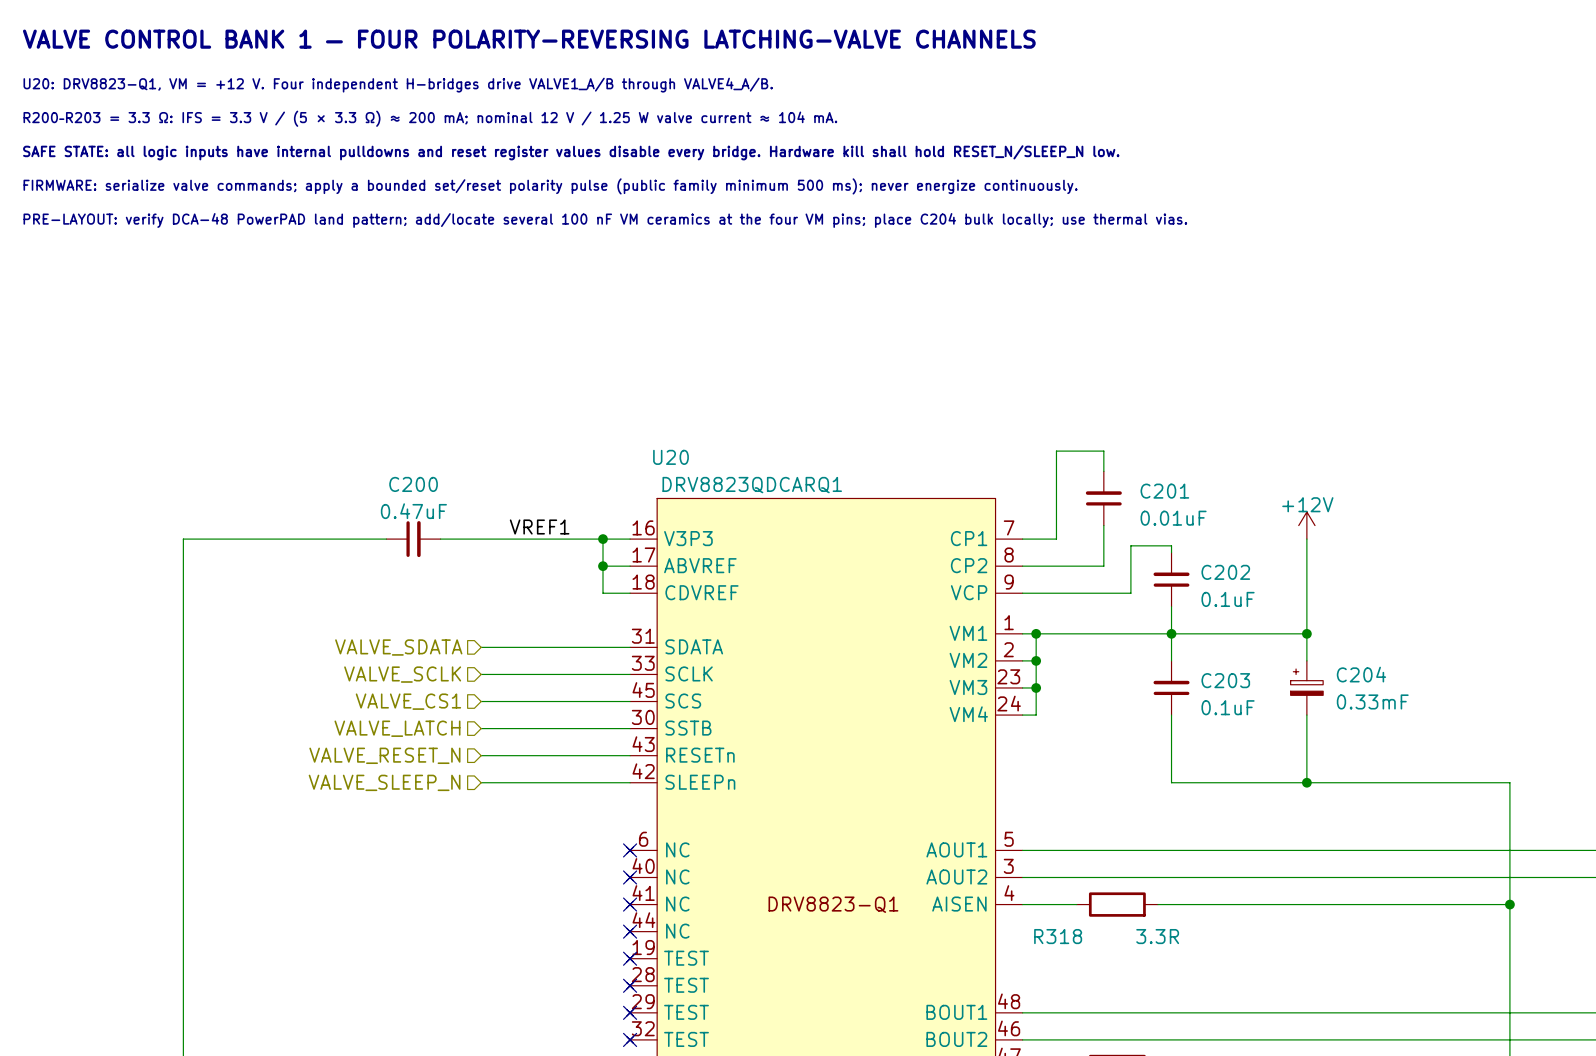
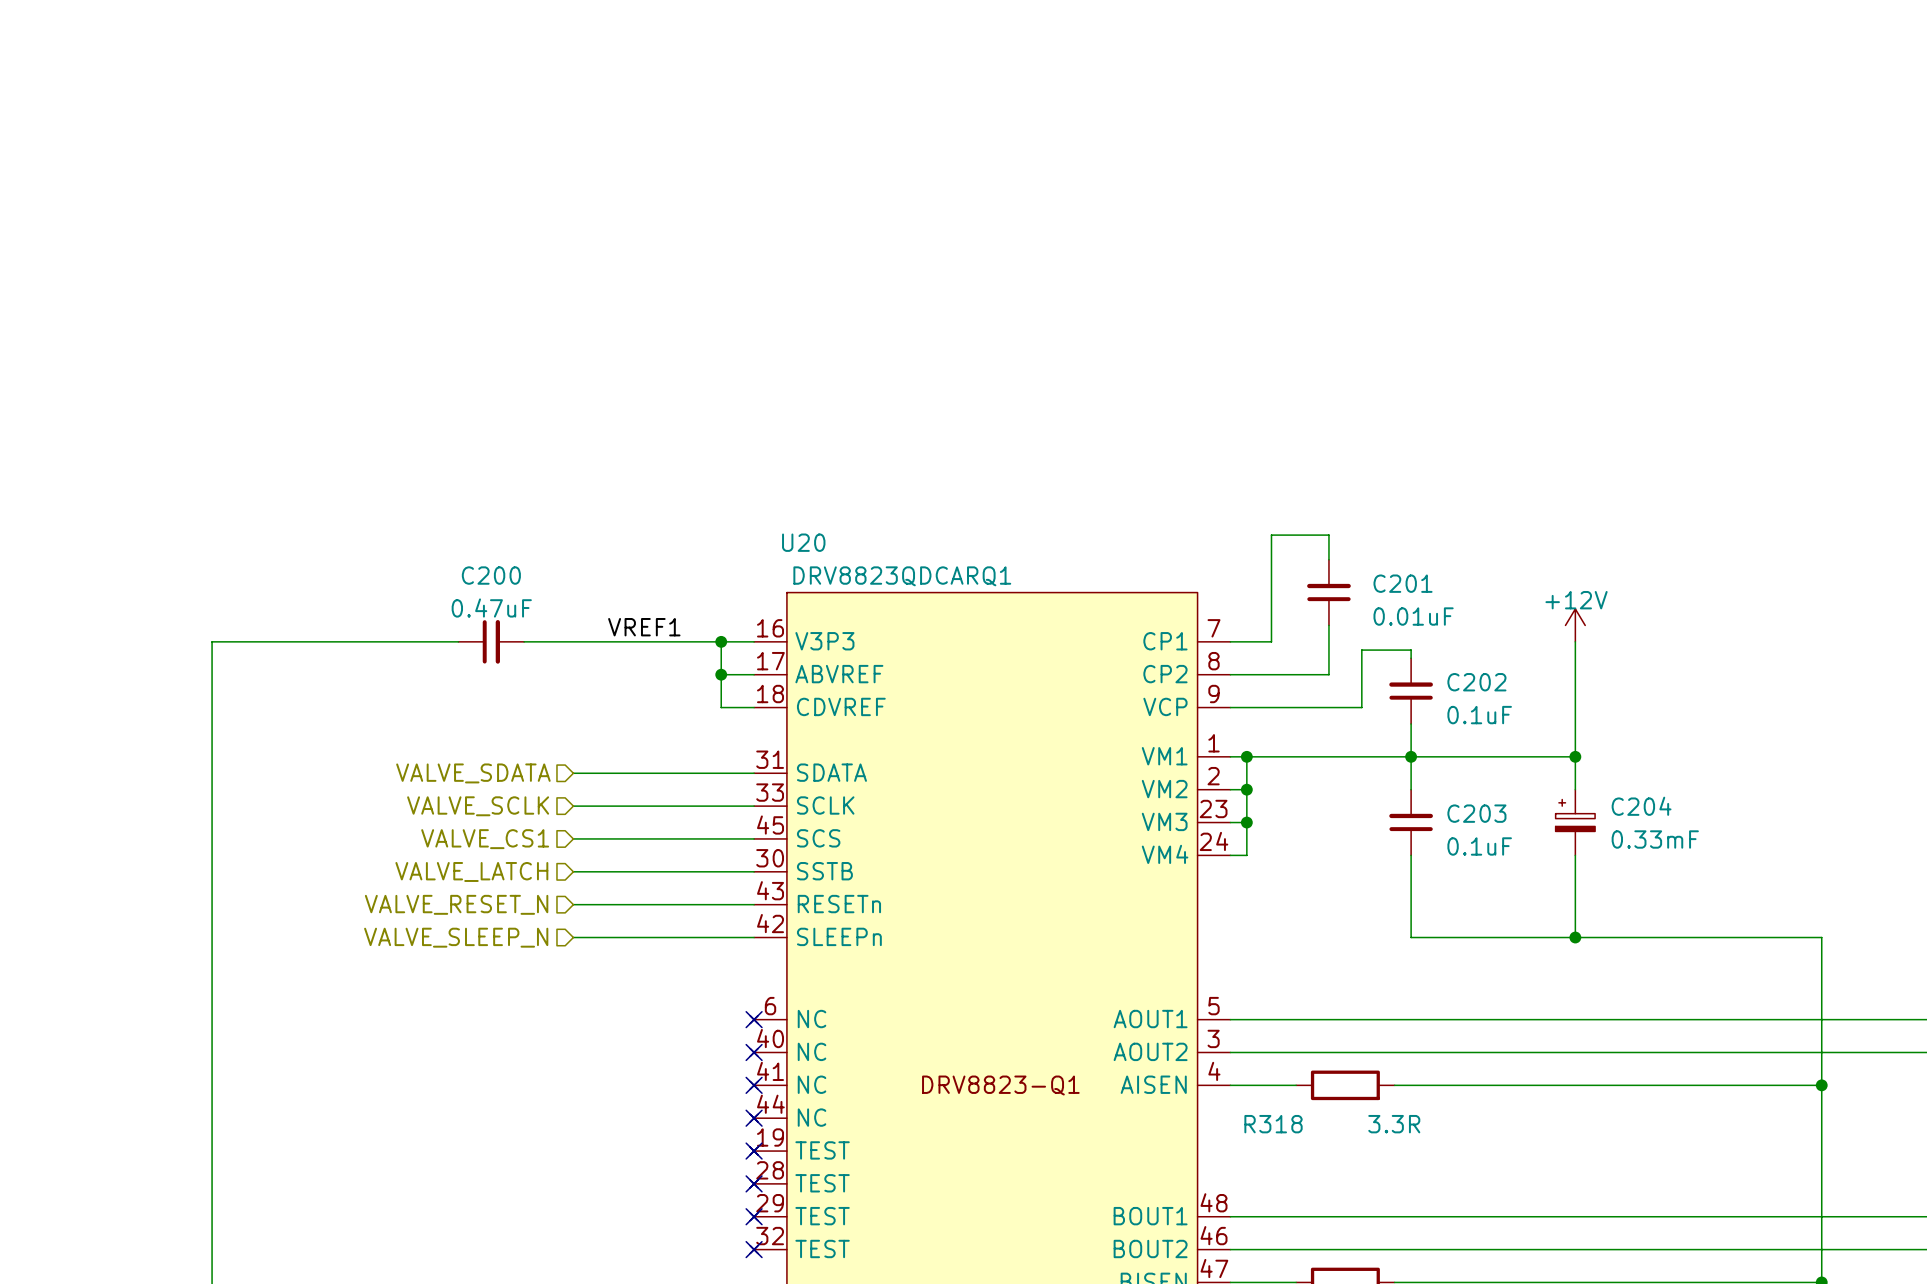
text: VALVE CONTROL BANK 1 — FOUR POLARITY-REVERSING LATCHING-VALVE CHANNELS (529, 39) -> none
text: U20: DRV8823-Q1, VM = +12 V. Four independent H-bridges drive VALVE1_A/B through VALVE4_A/B. (398, 85) -> none
text: R200–R203 = 3.3 Ω: IFS = 3.3 V / (5 × 3.3 Ω) ≈ 200 mA; nominal 12 V / 1.25 W valve current ≈ 104 mA. (430, 118) -> none
text: SAFE STATE: all logic inputs have internal pulldowns and reset register values disable every bridge. Hardware kill shall hold RESET_N/SLEEP_N low. (571, 152) -> none
text: FIRMWARE: serialize valve commands; apply a bounded set/reset polarity pulse (public family minimum 500 ms); never energize continuously. (550, 186) -> none
text: PRE-LAYOUT: verify DCA-48 PowerPAD land pattern; add/locate several 100 nF VM ceramics at the four VM pins; place C204 bulk locally; use thermal vias. (605, 220) -> none

